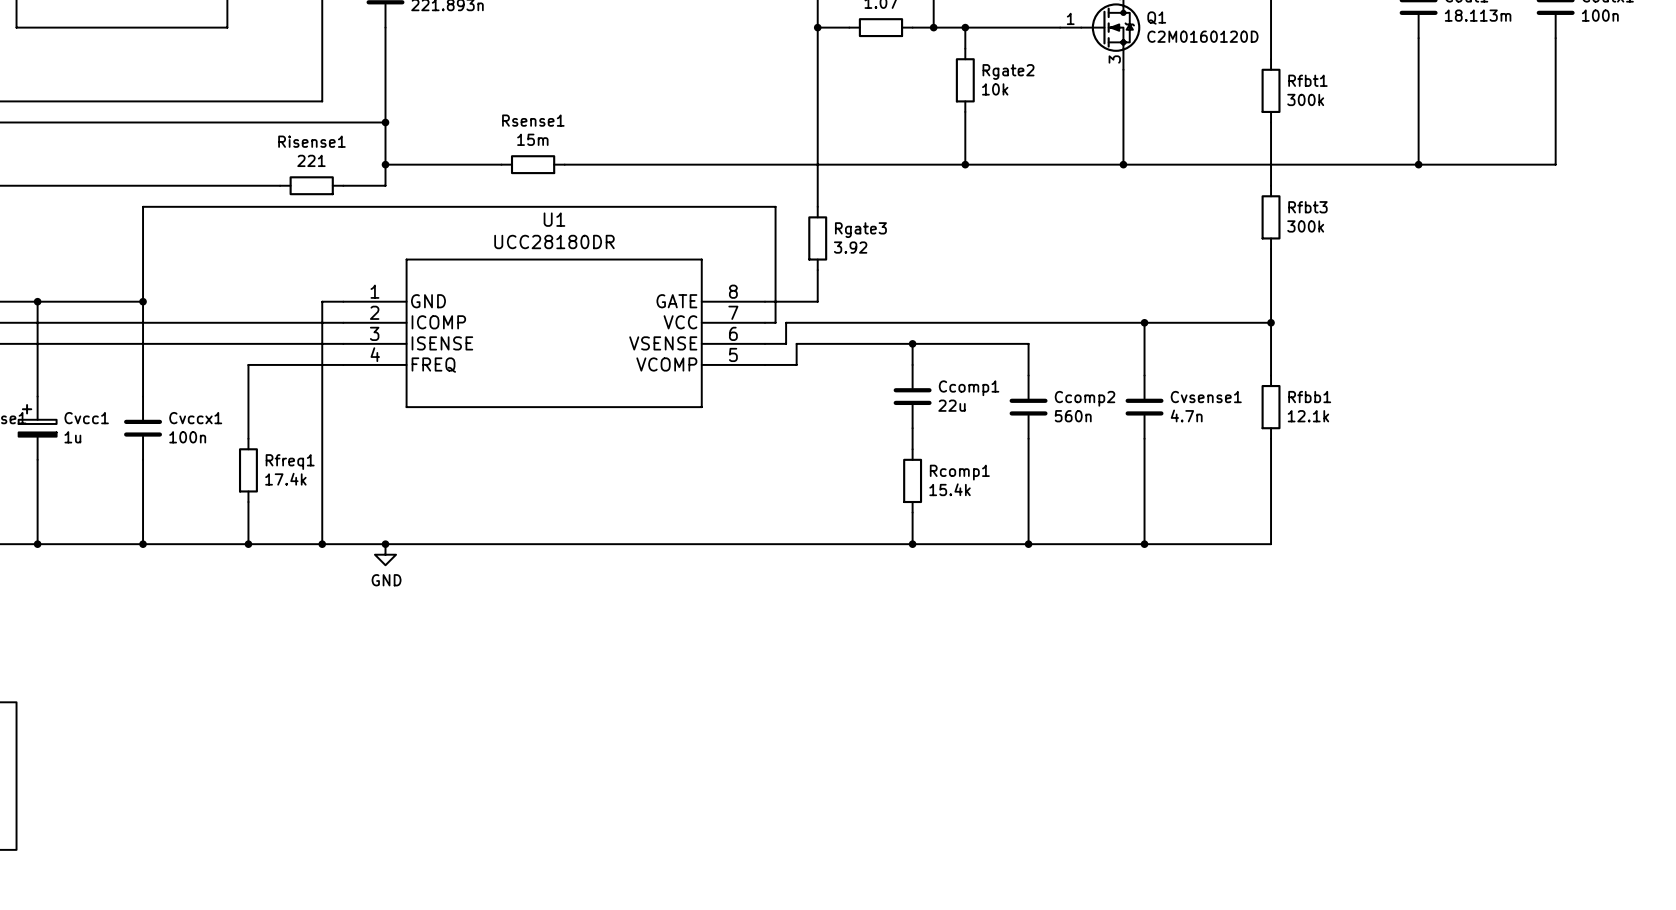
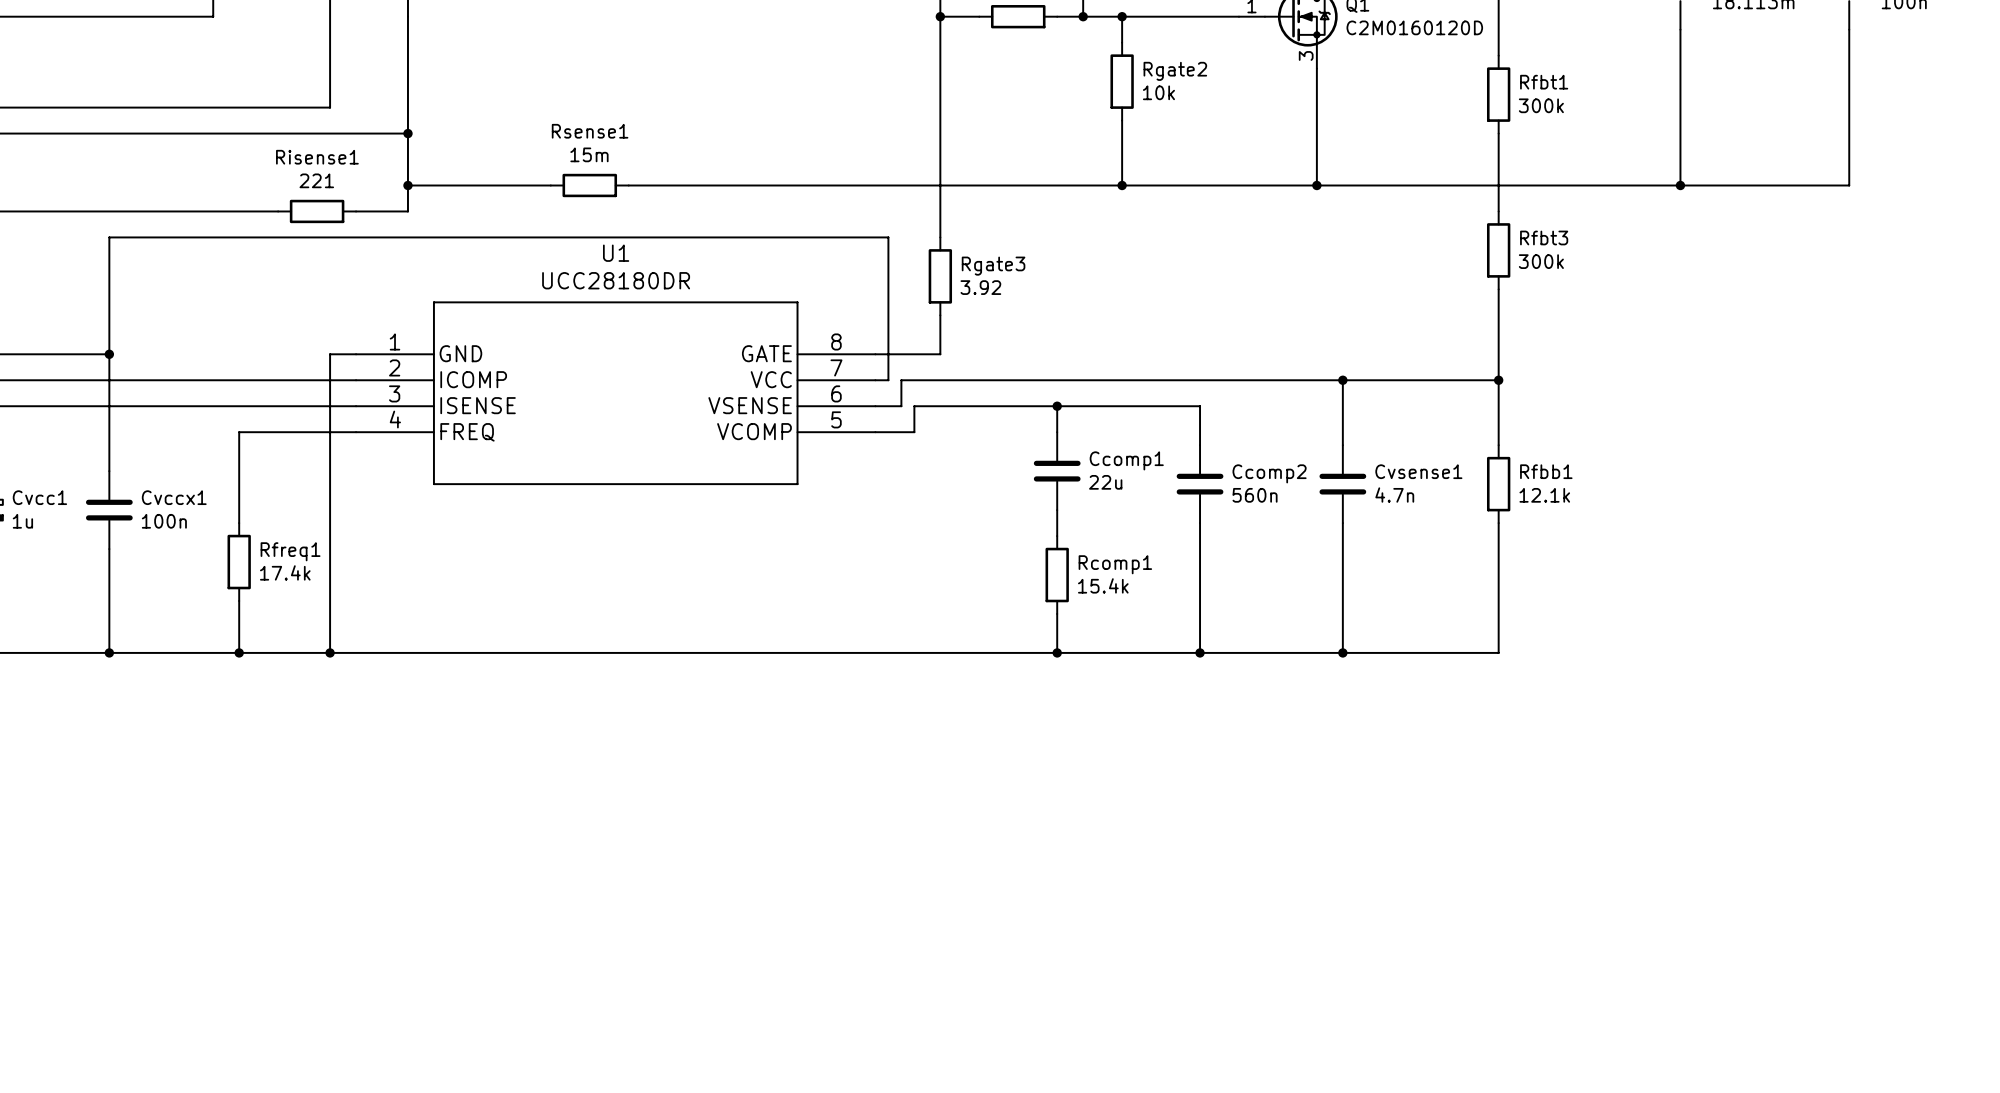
junction: (385, 544) -> none
power symbol: GND (385, 554) -> none

